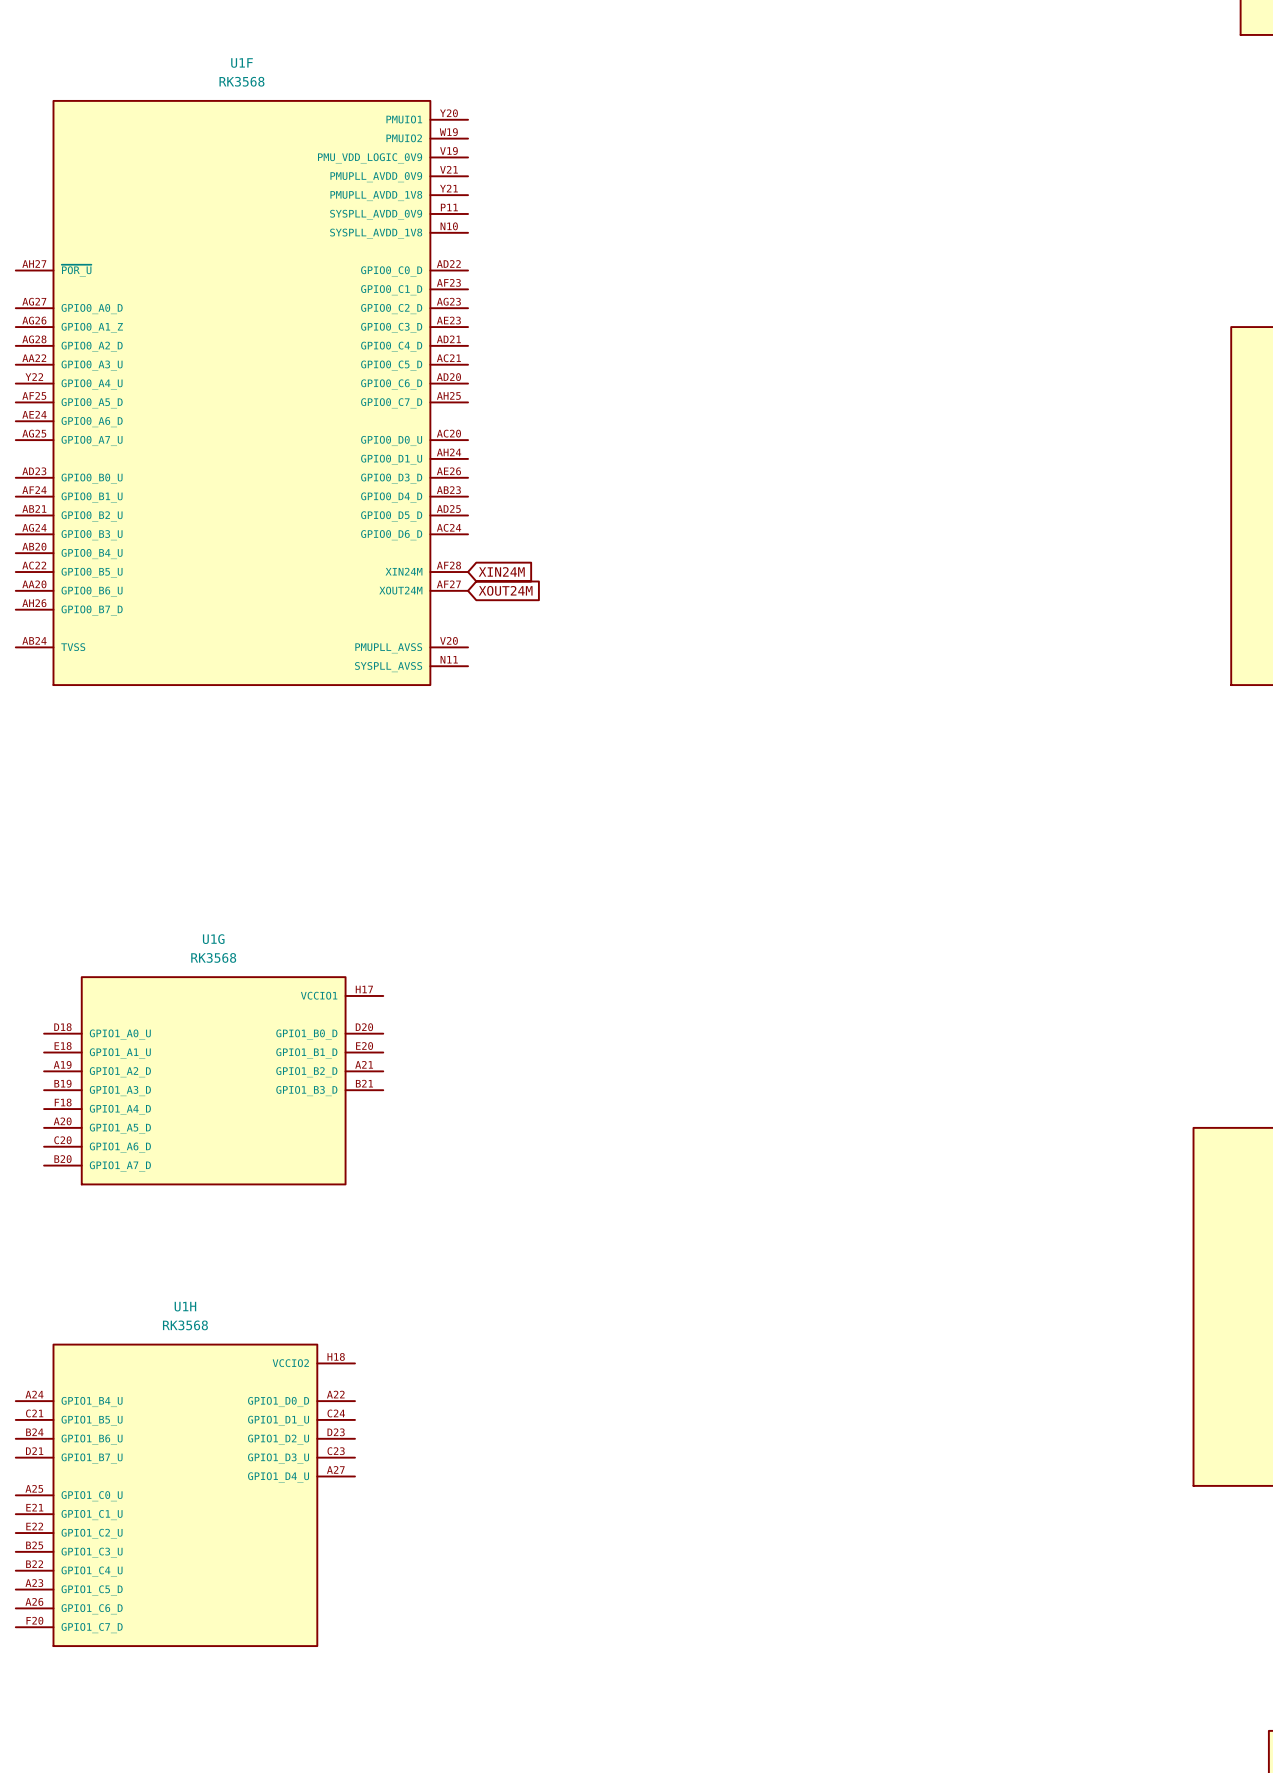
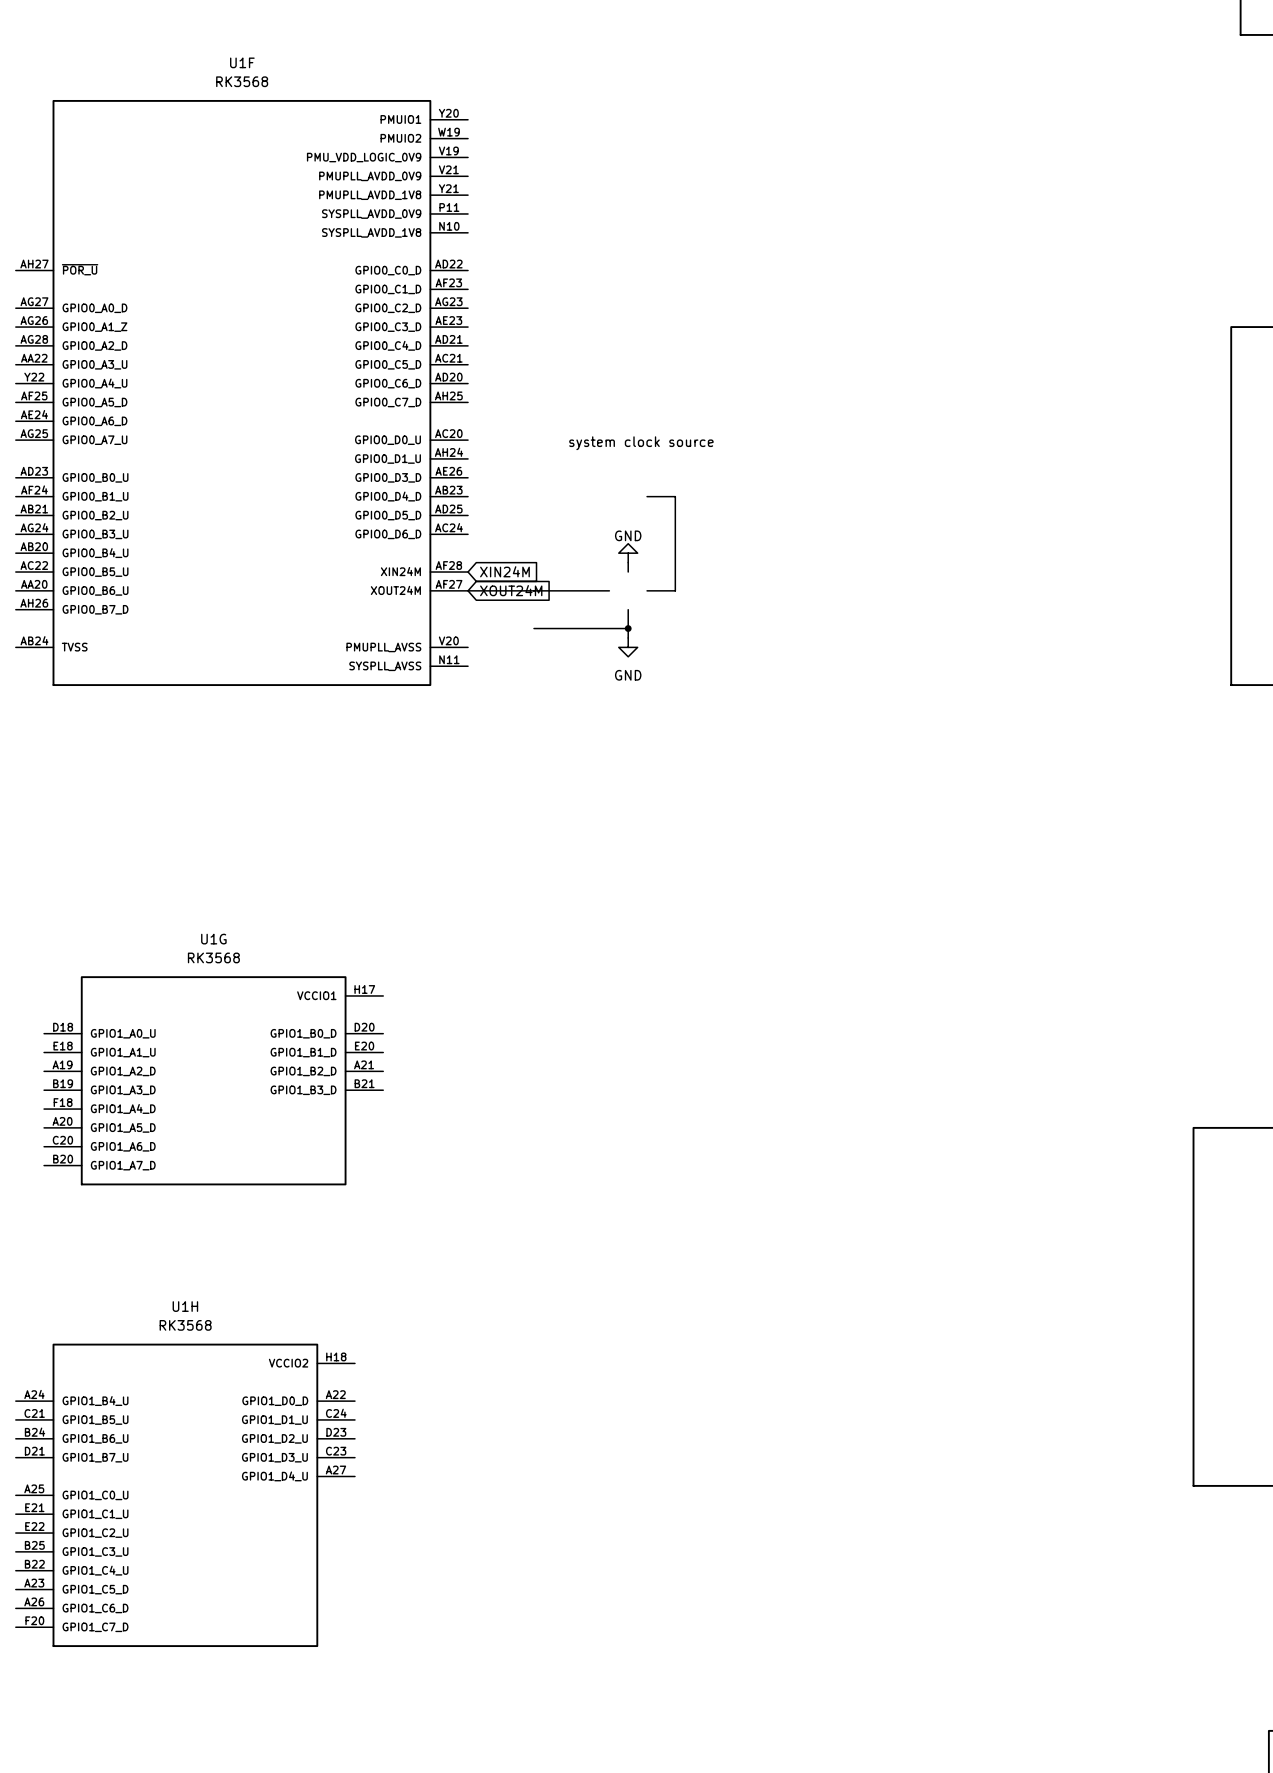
text: none -> system clock source (641, 443)
wire: none -> (647, 496) (675, 496) (675, 590) (647, 590)
power symbol: none -> GND (628, 553)
wire: none -> (628, 562) (628, 572)
wire: none -> (468, 590) (609, 590)
wire: none -> (628, 609) (628, 637)
wire: none -> (533, 628) (628, 628)
junction: none -> (628, 628)
power symbol: none -> GND (628, 647)

